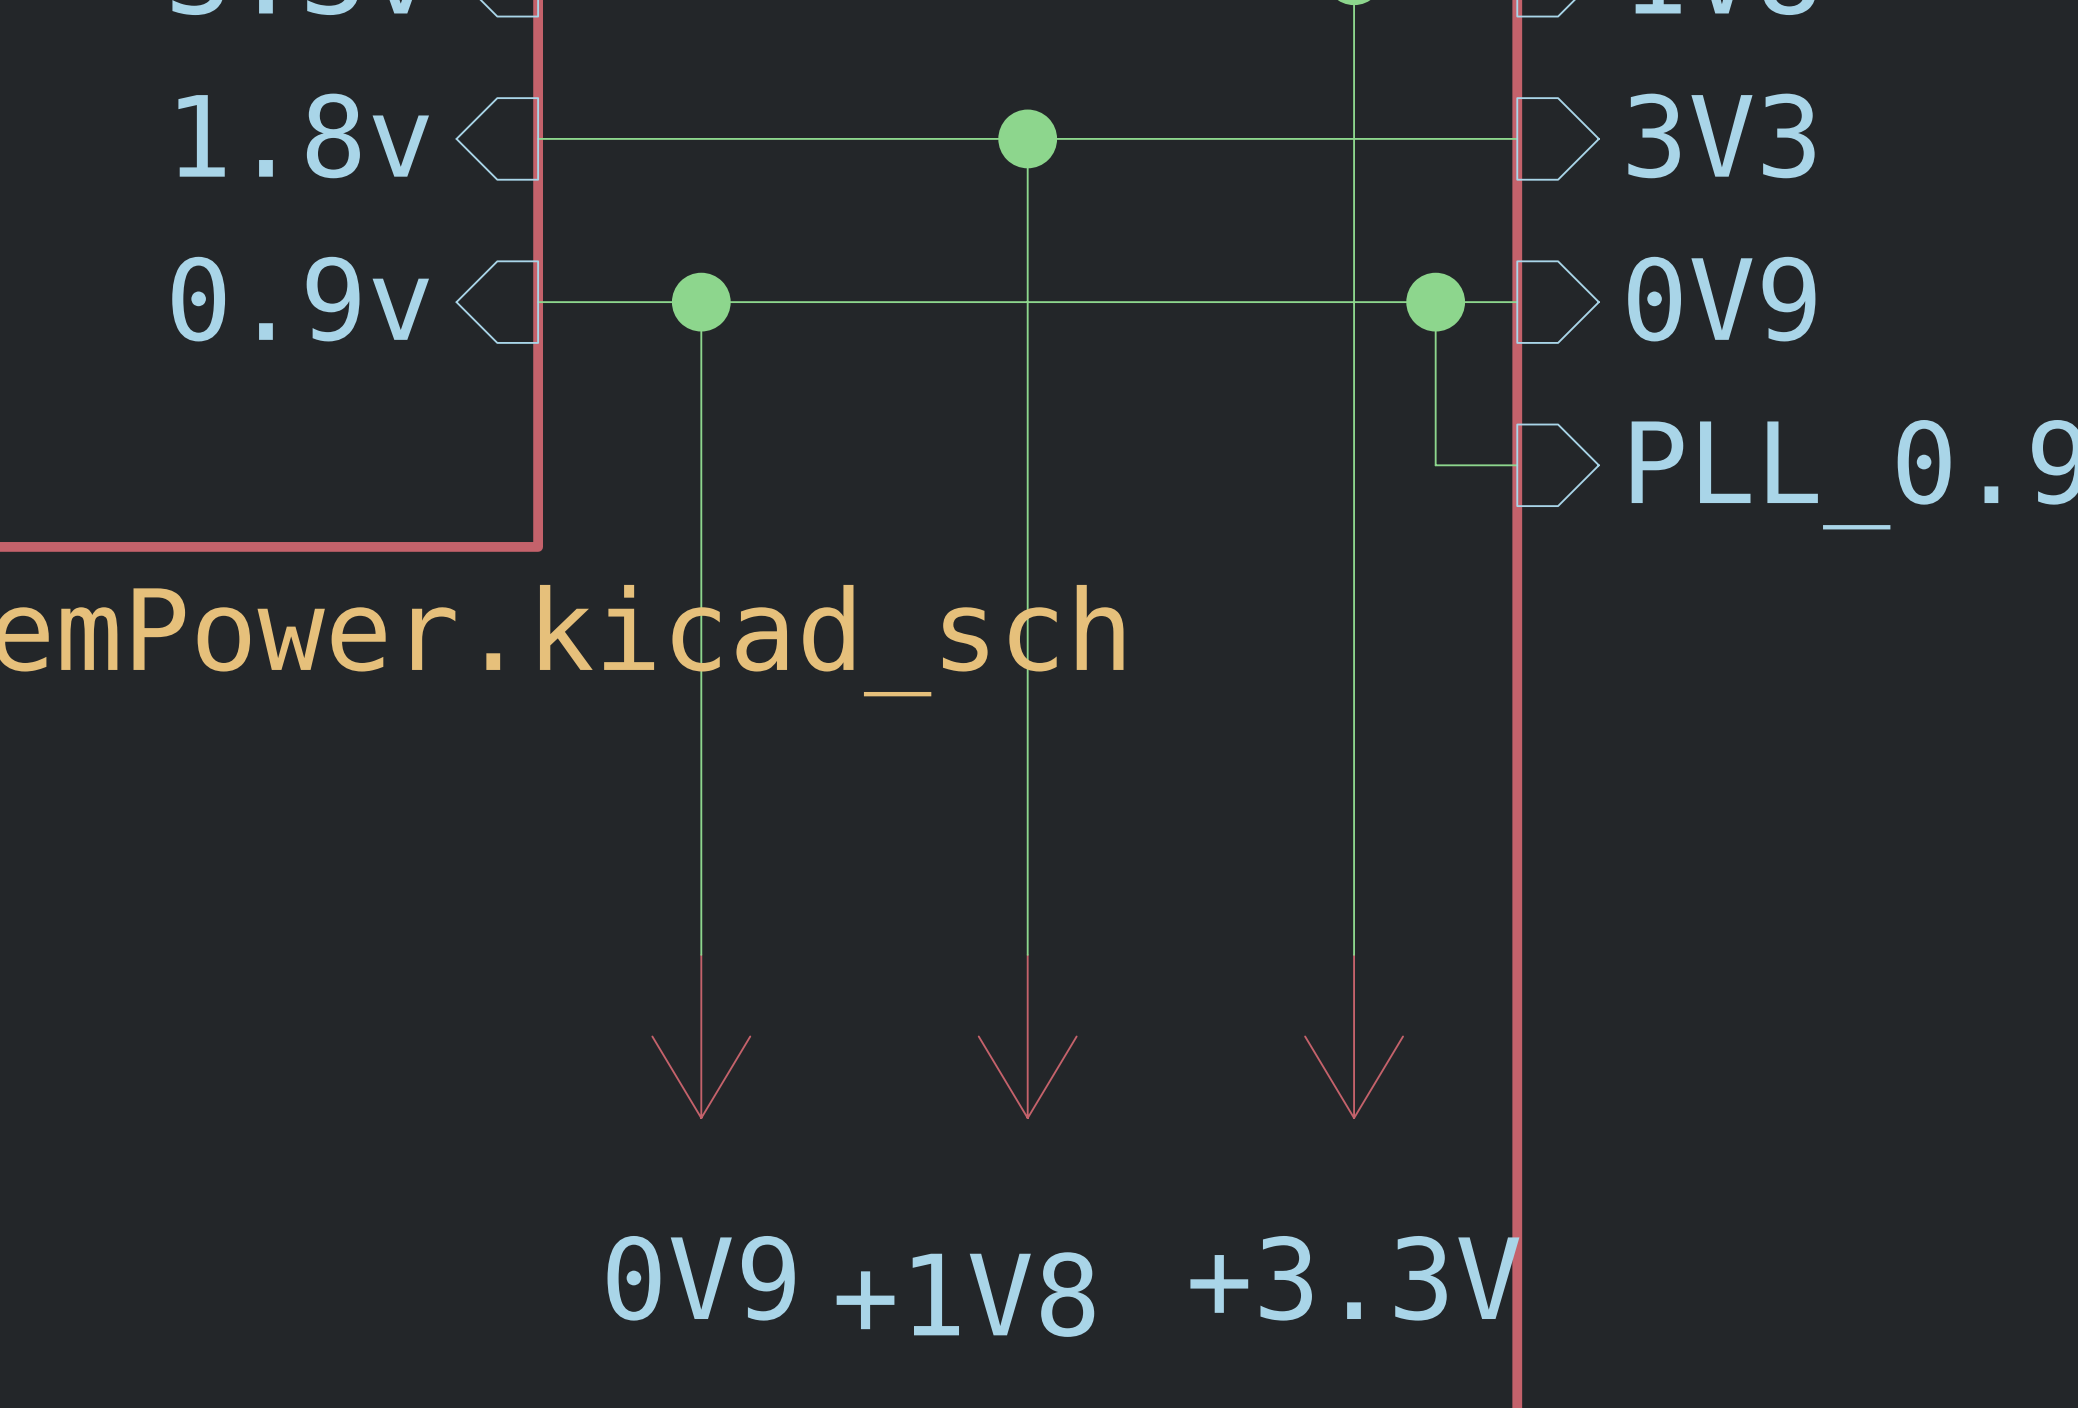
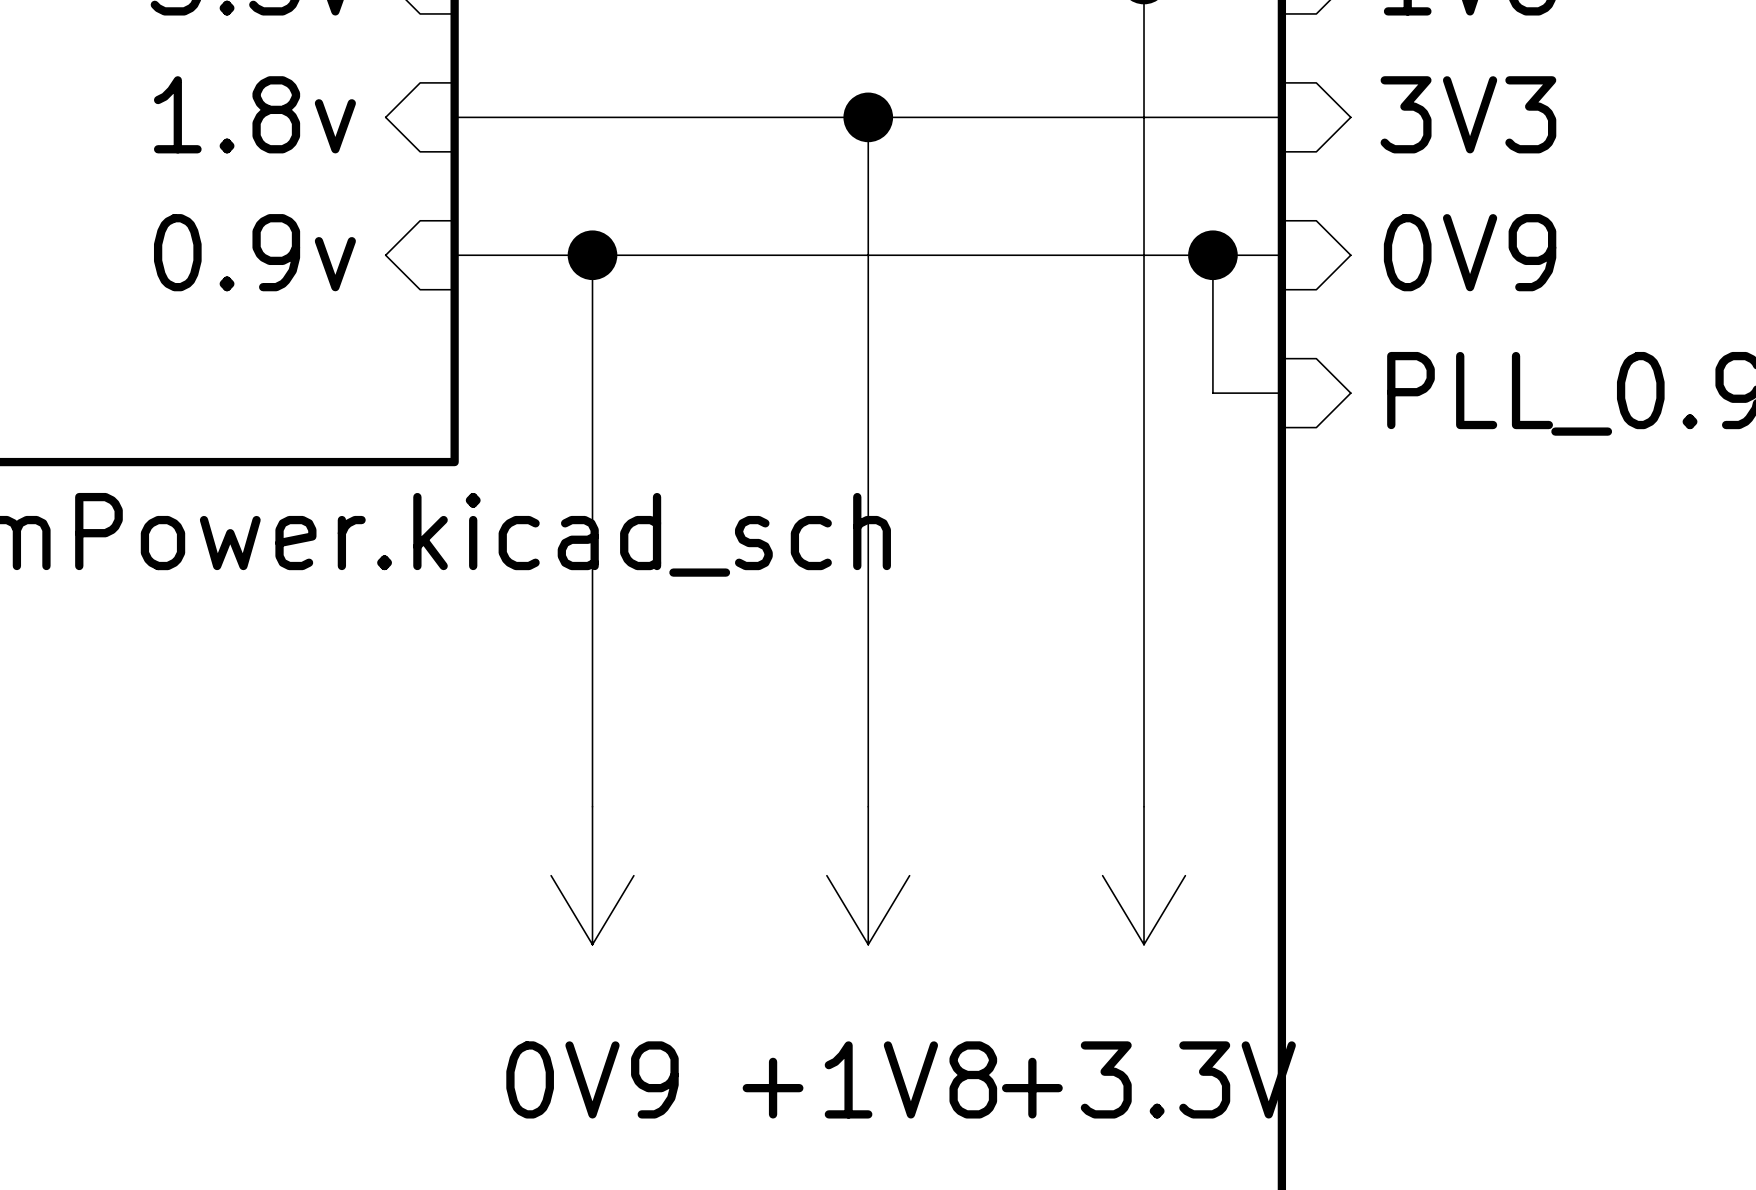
power symbol text position: +1V8 (965, 1294) -> +1V8 (869, 1079)

